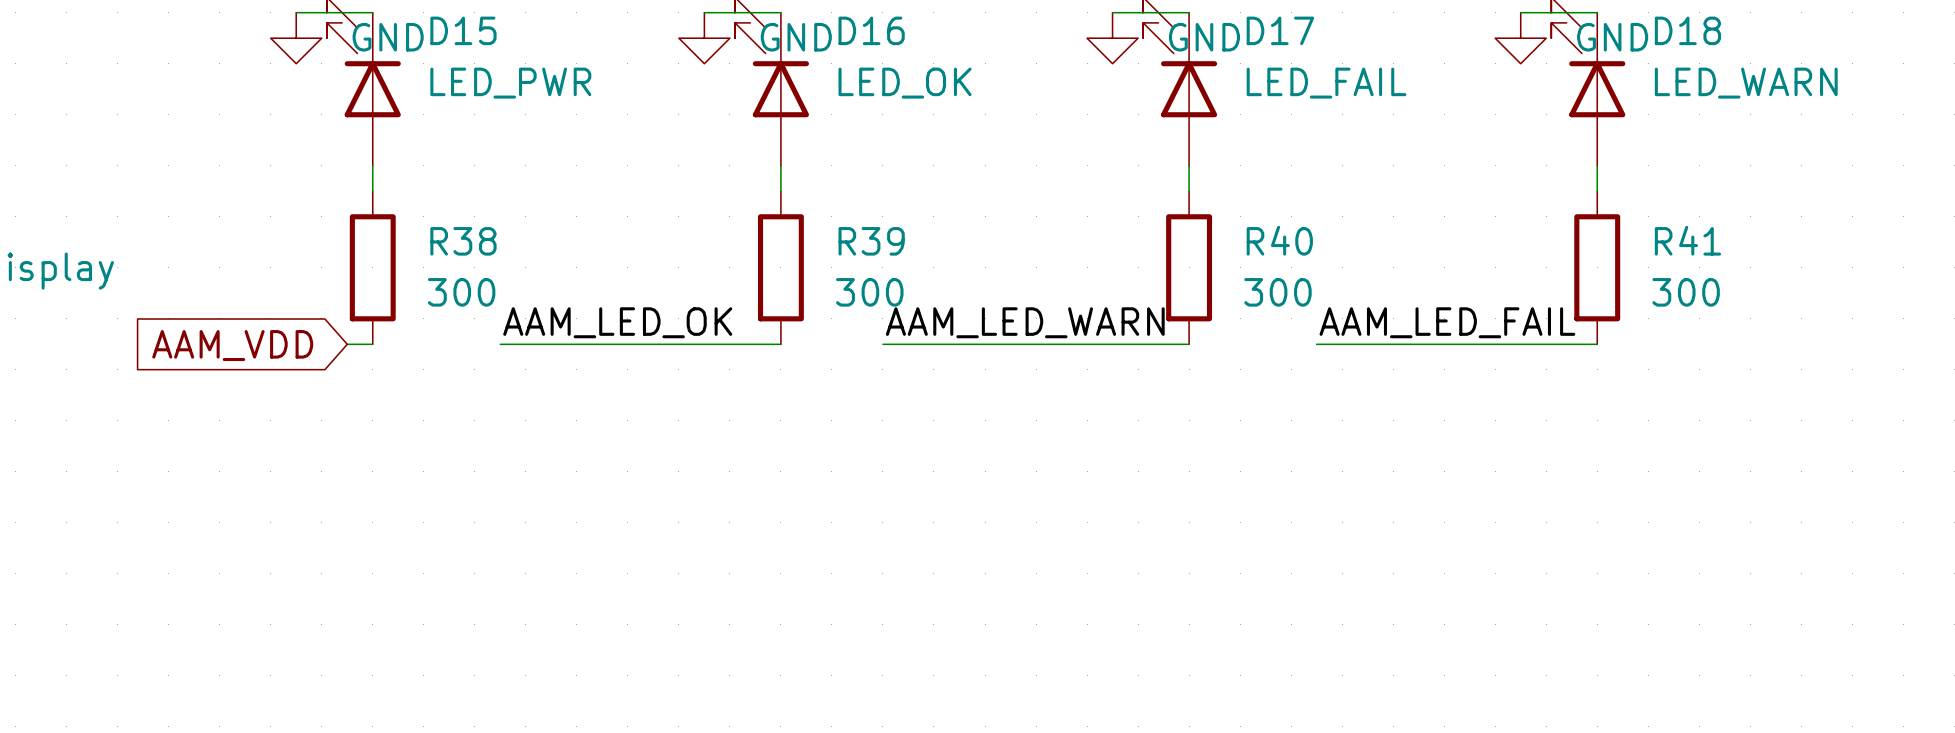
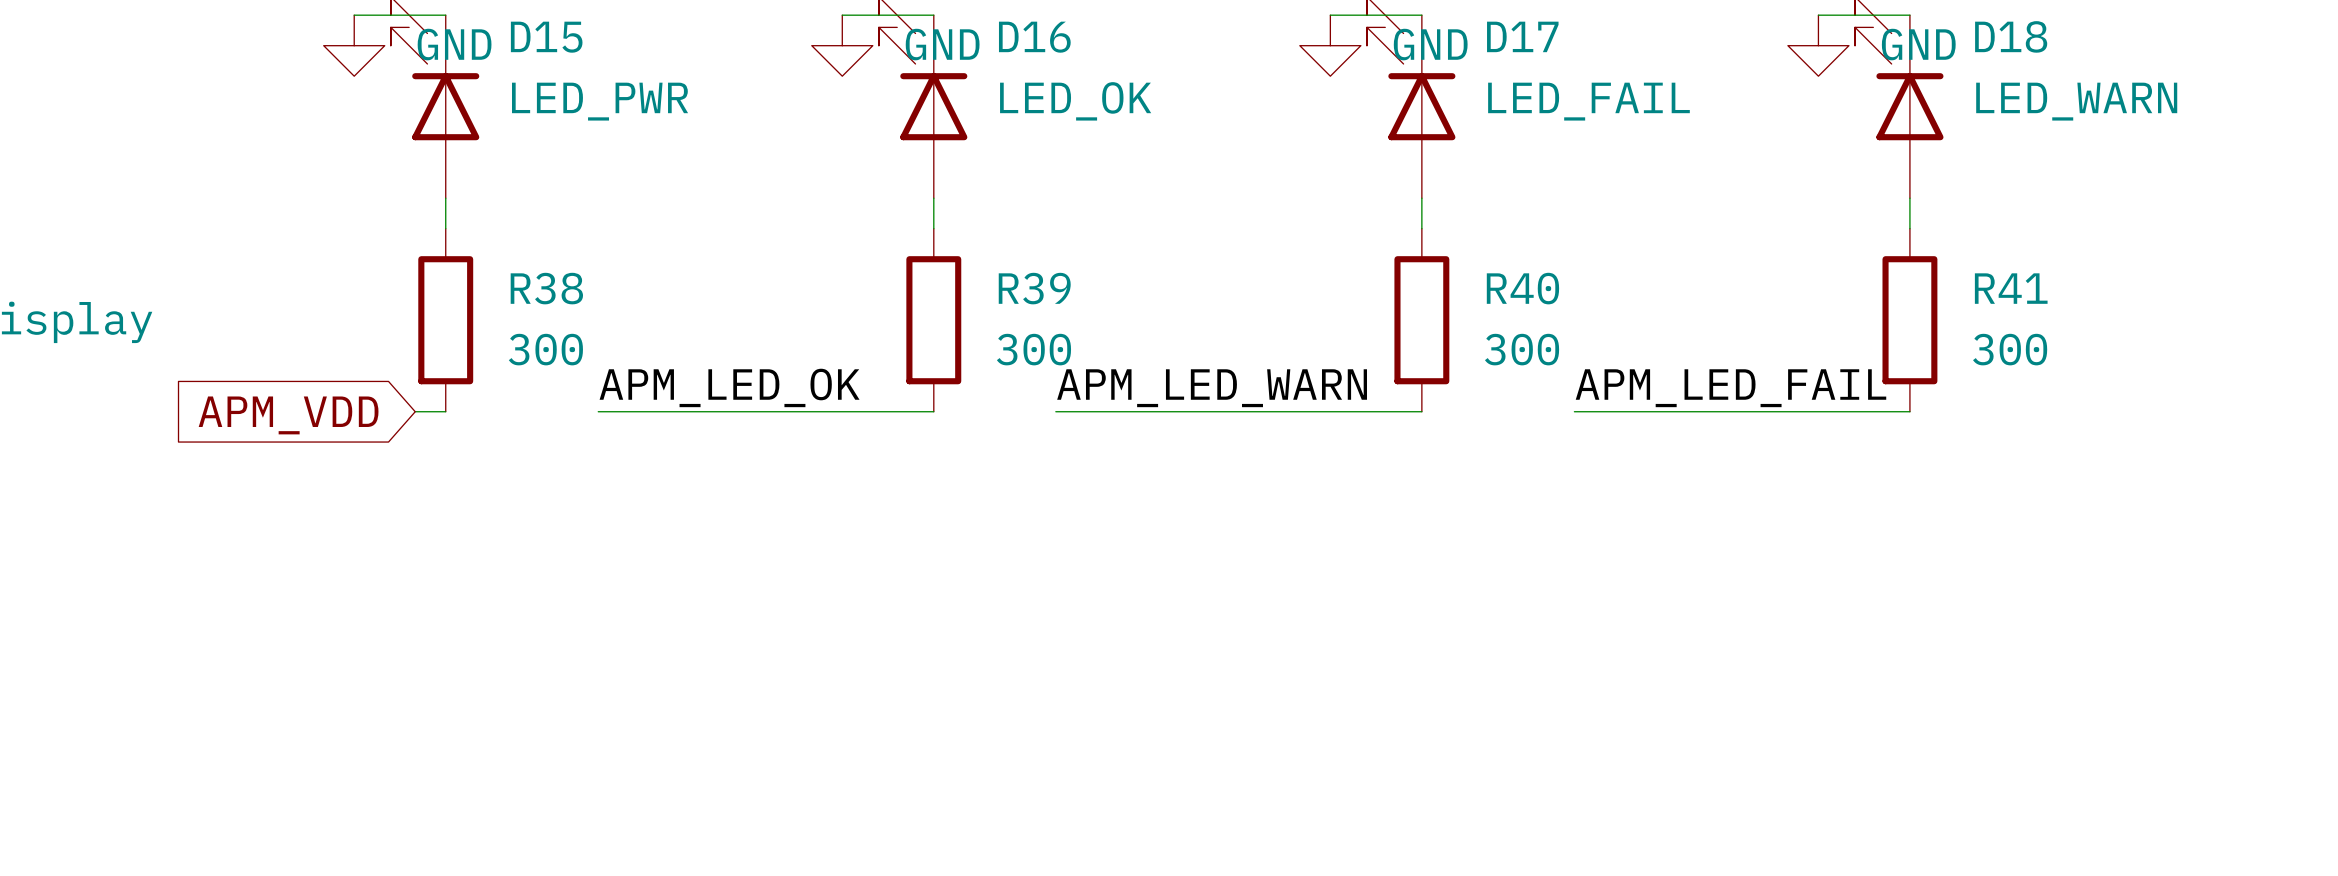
label: AAM_LED_OK (617, 322) -> APM_LED_OK (729, 387)
label: AAM_LED_WARN (1025, 322) -> APM_LED_WARN (1212, 388)
label: AAM_LED_FAIL (1447, 322) -> APM_LED_FAIL (1730, 388)
global label: AAM_VDD (232, 345) -> APM_VDD (288, 415)

